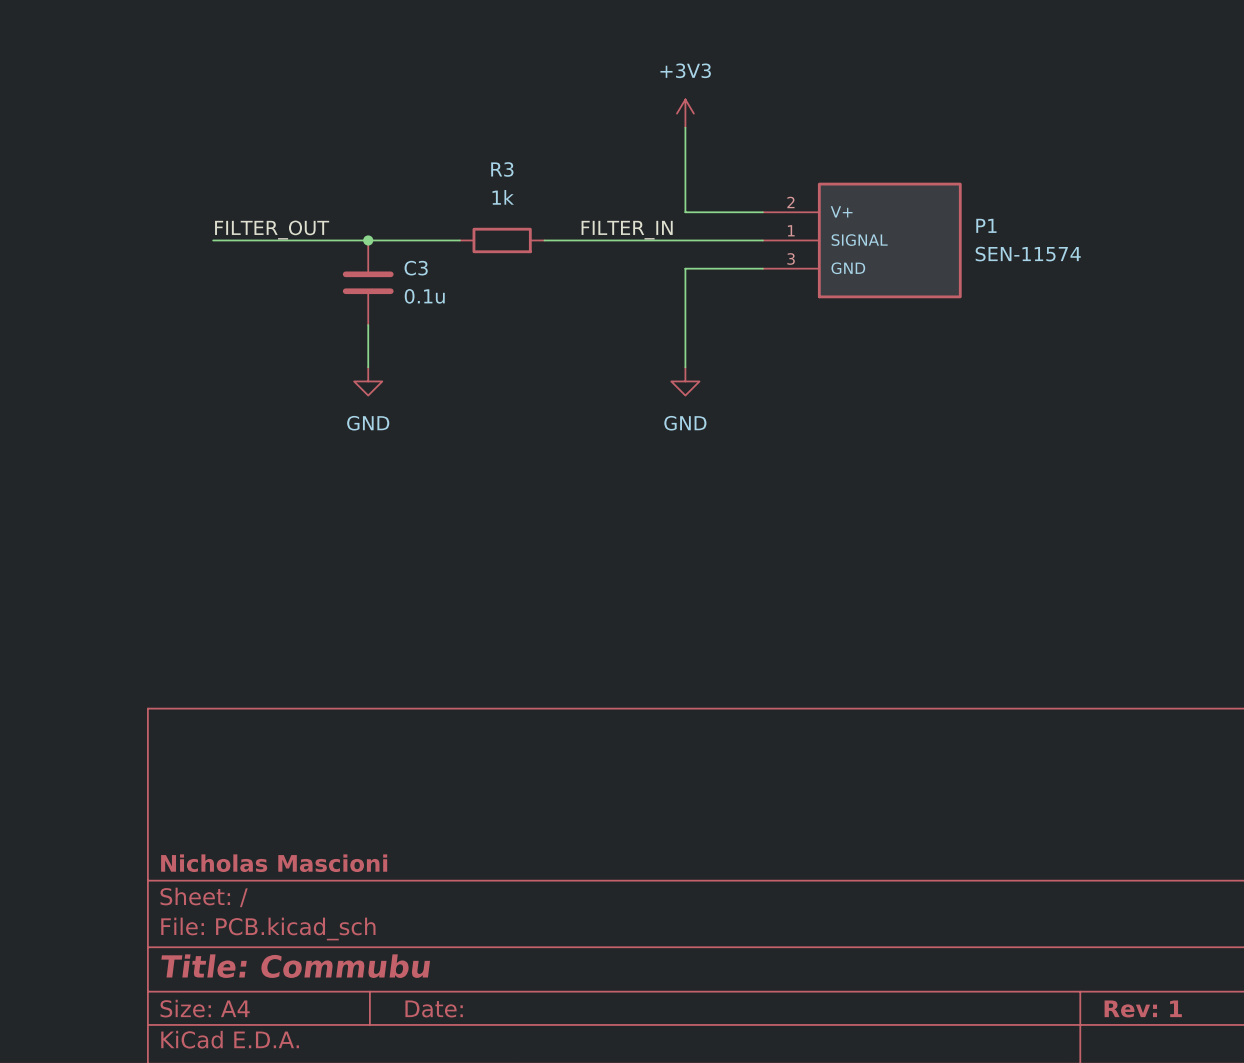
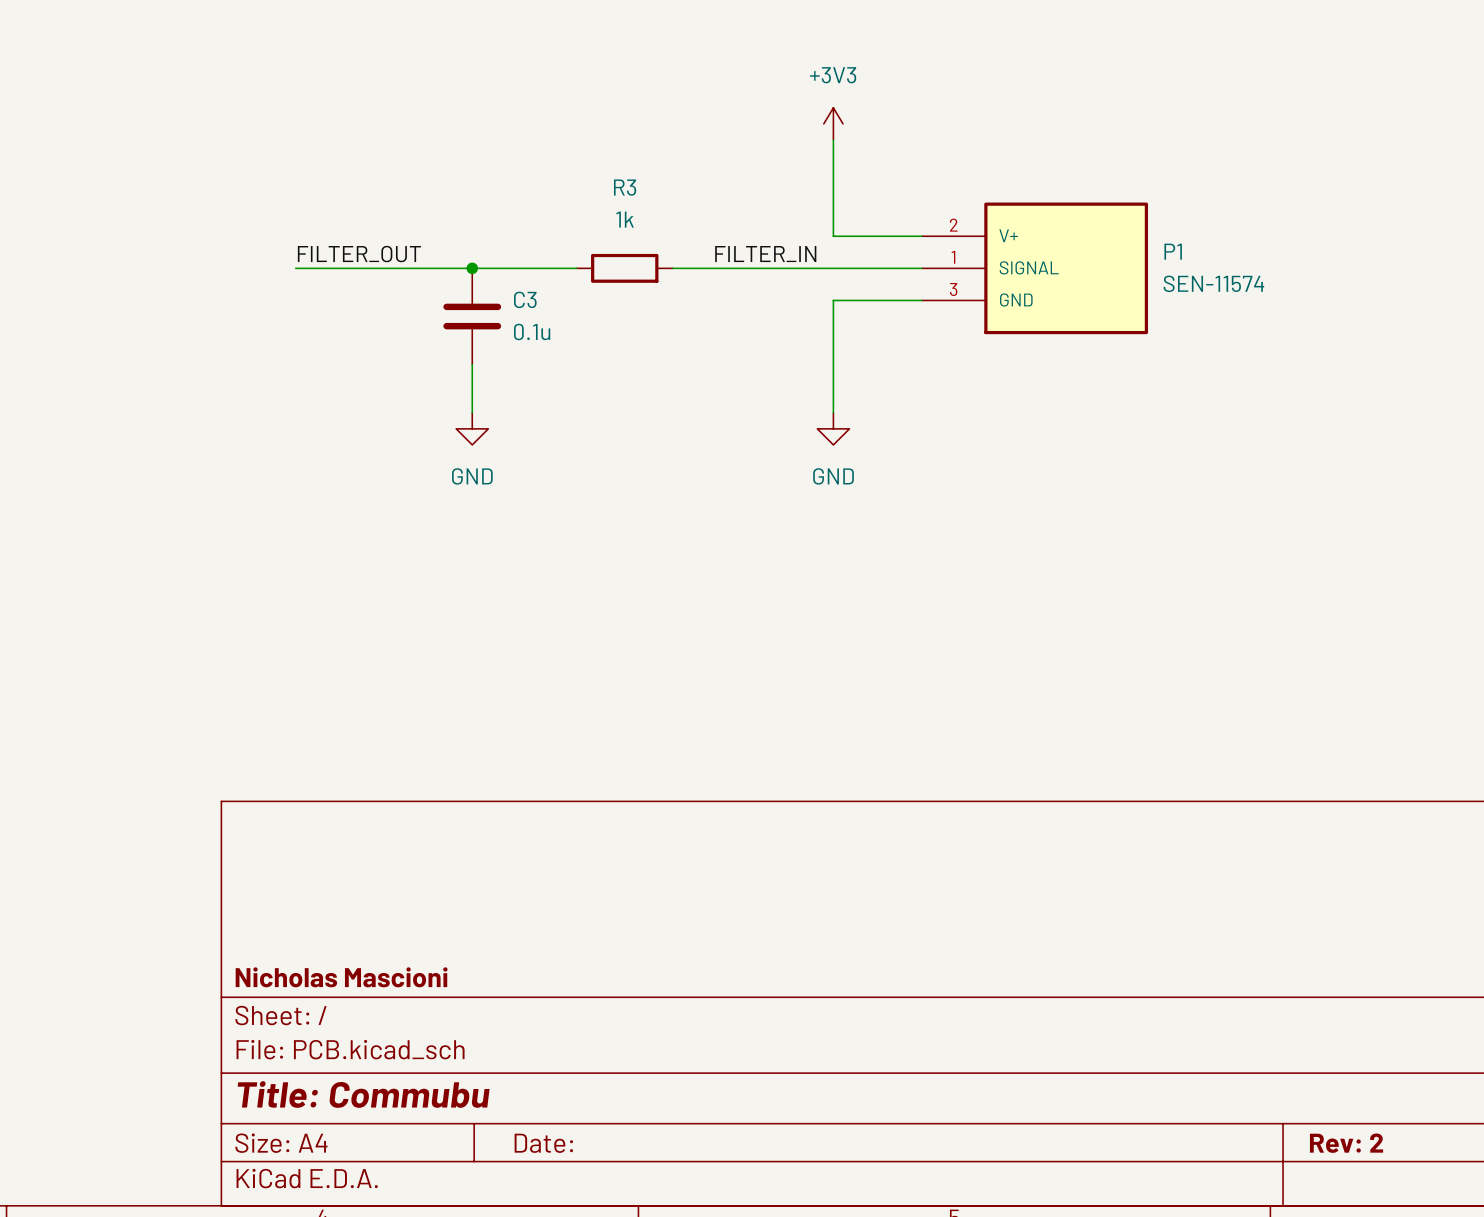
title block: Rev: 1 (1143, 1008) -> Rev: 2 (1346, 1143)

